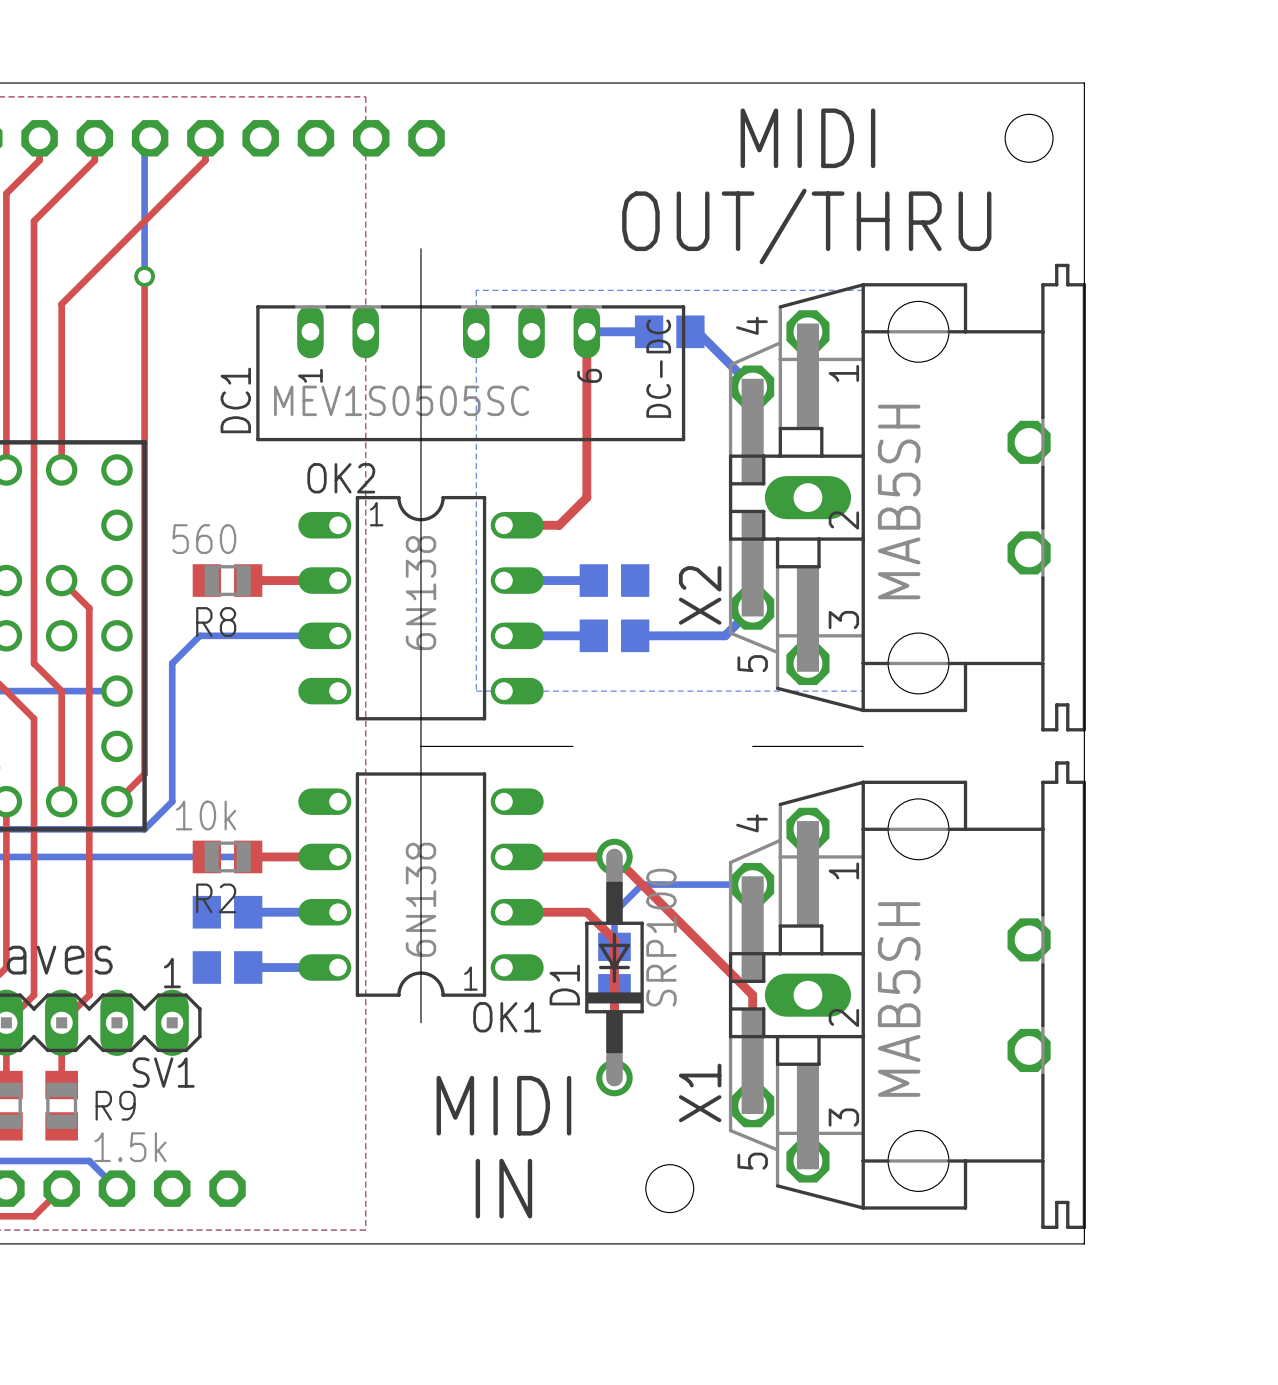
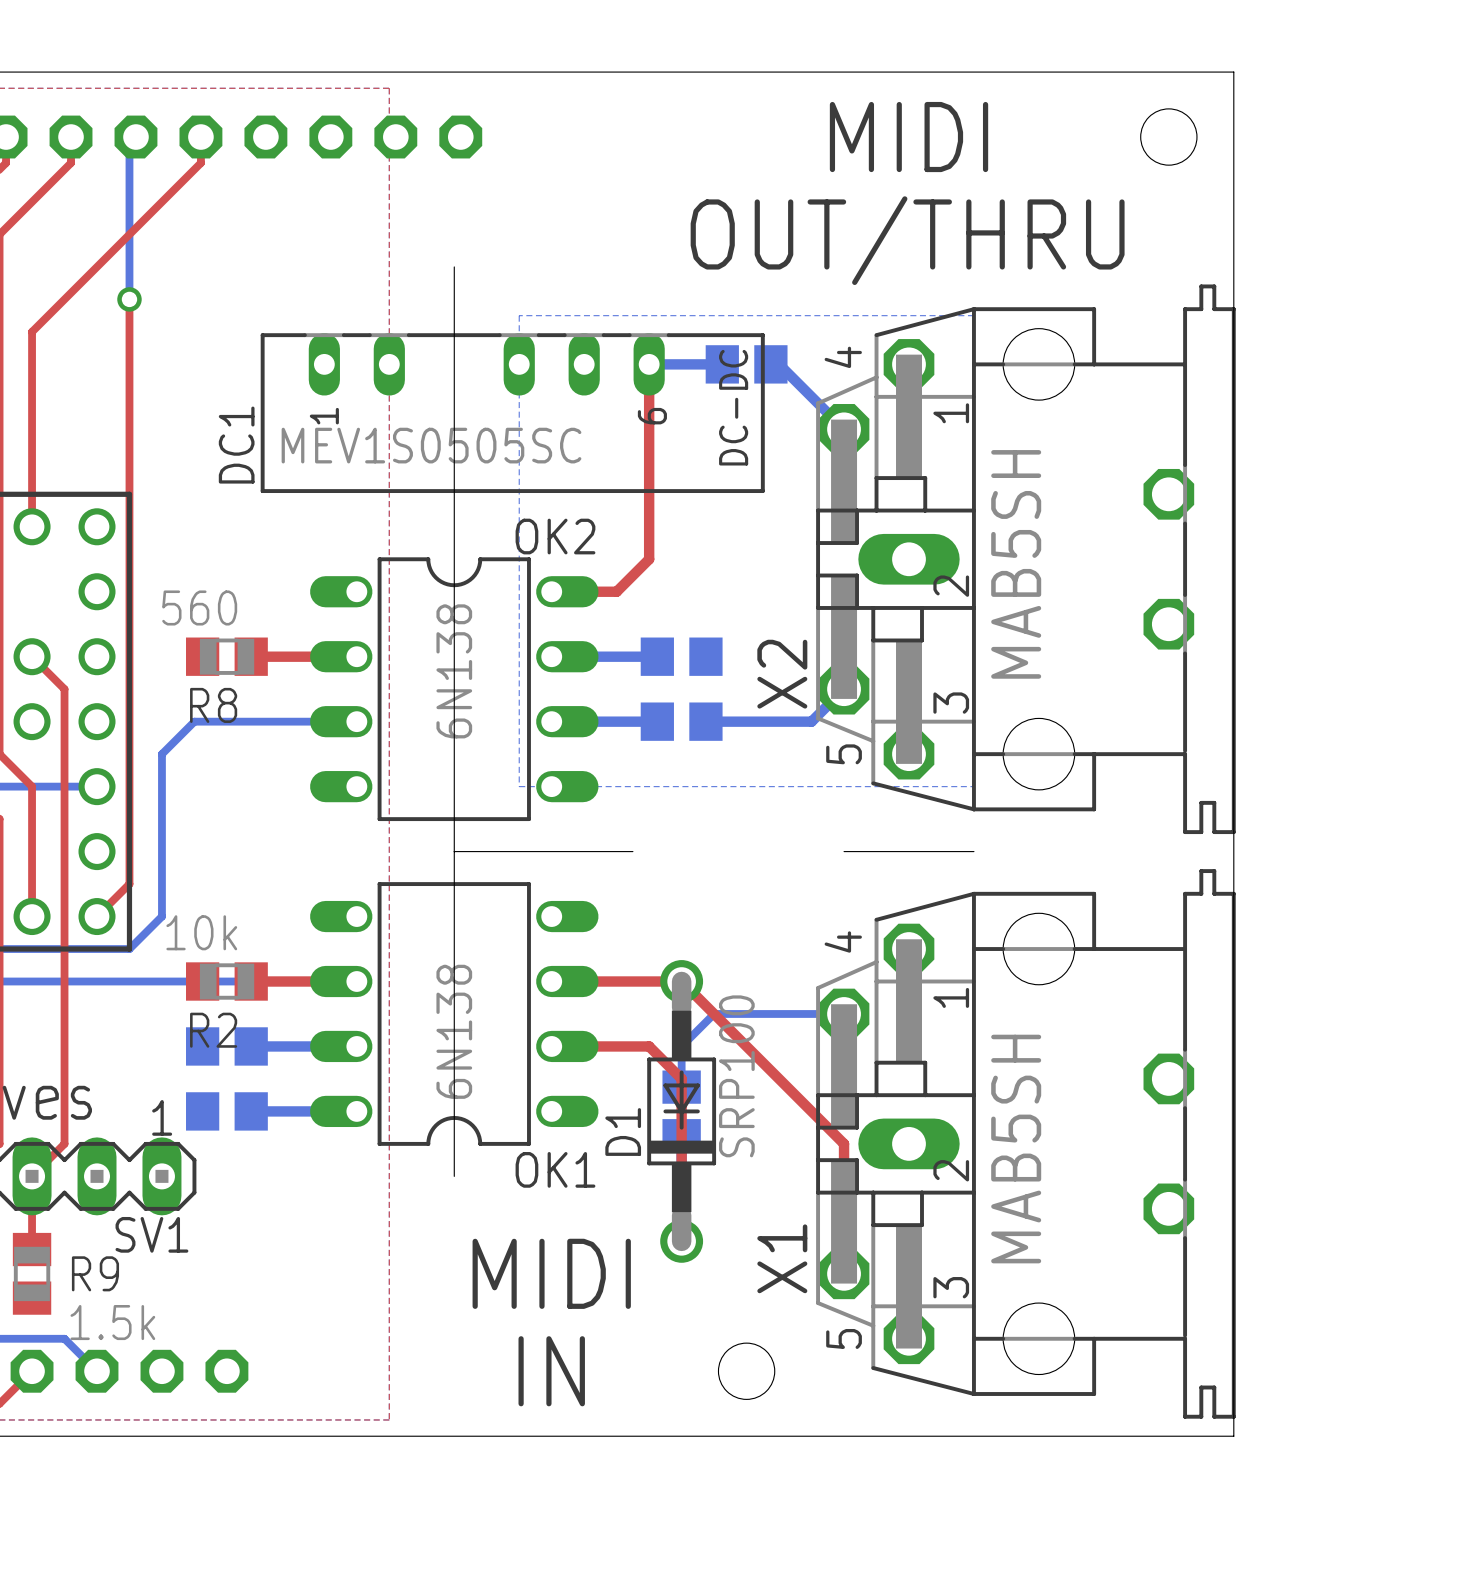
OK2 name position: OK2 (341, 478) -> OK2 (555, 536)
text: 1 (376, 514) -> none
text: 1 (470, 978) -> none

